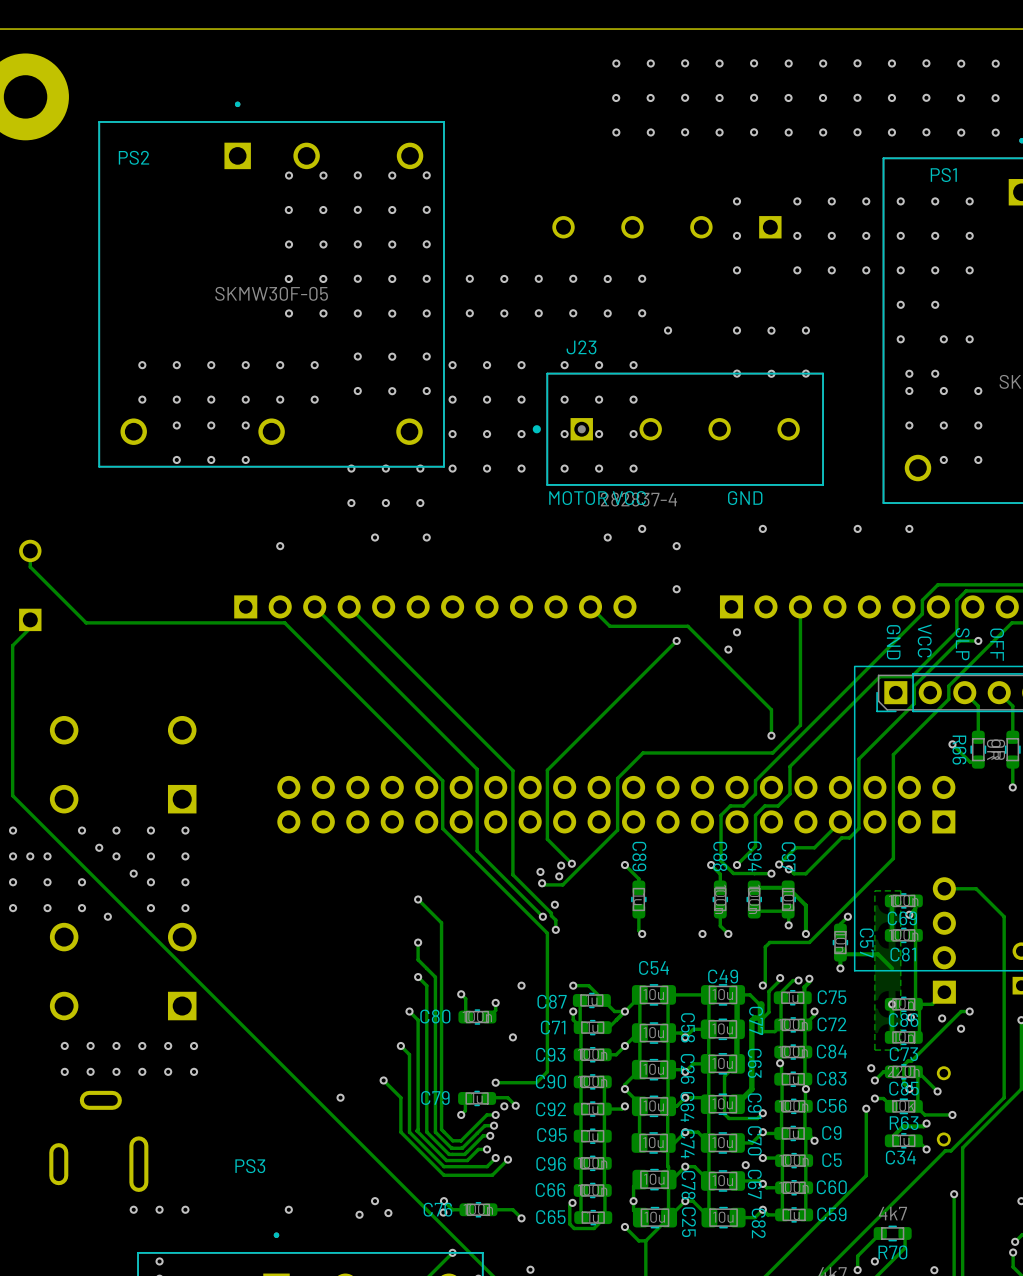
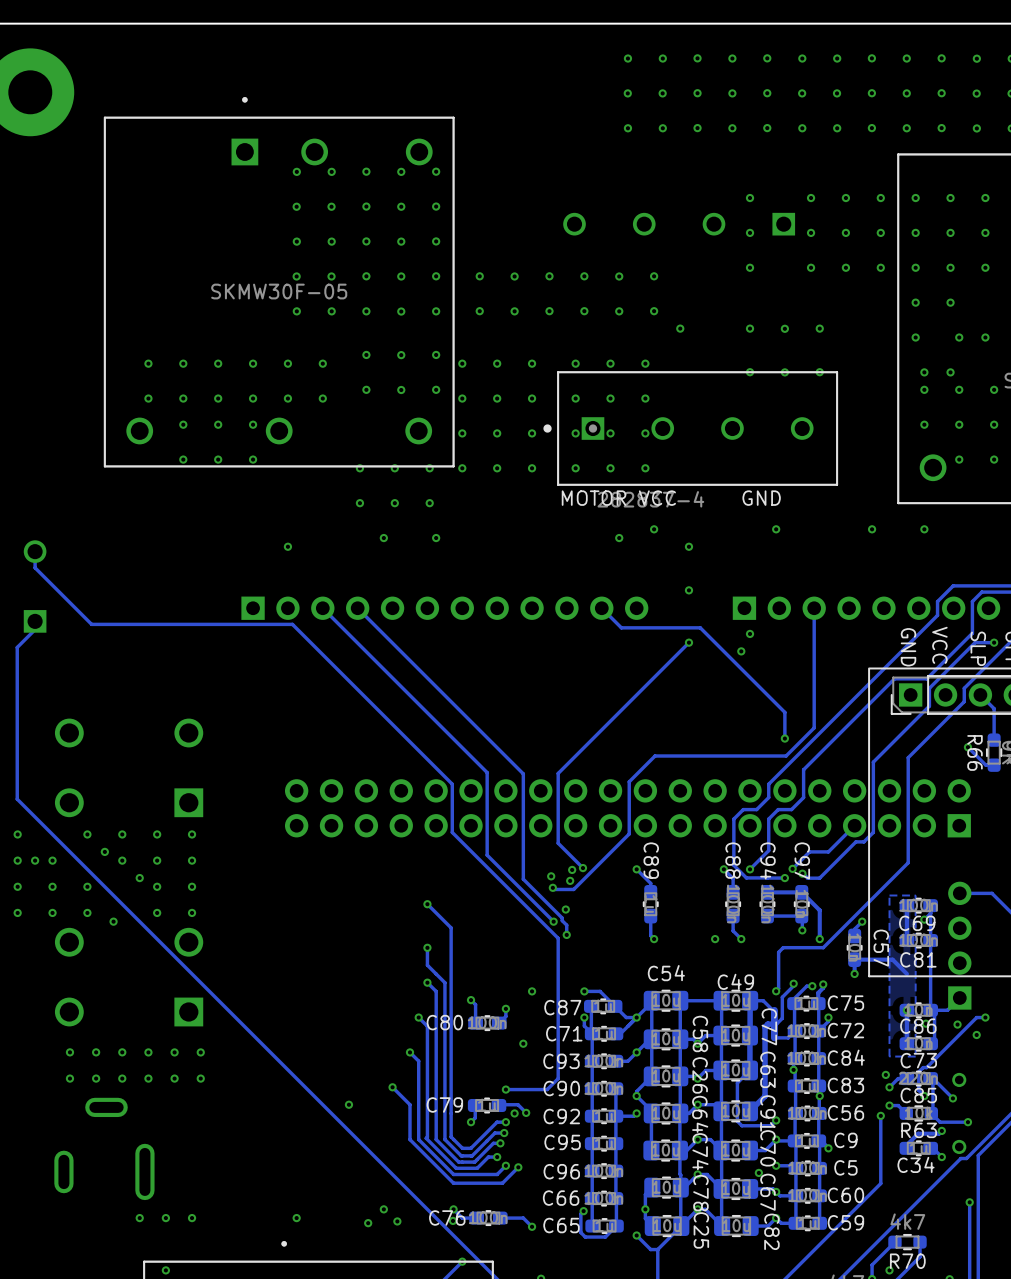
PS2 name: PS2 (133, 157) -> none
PS1 name: PS1 (943, 175) -> none
J23 name: J23 (581, 347) -> none
PS3 name: PS3 (250, 1166) -> none

